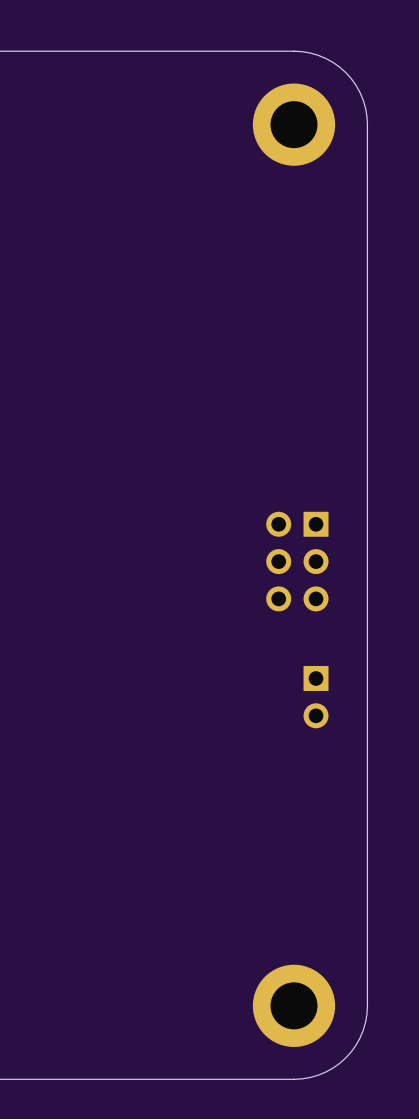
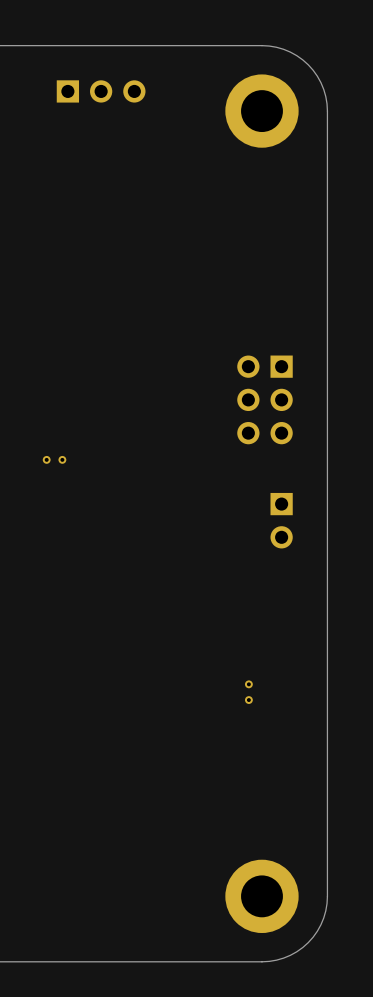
part: none -> (101, 91)
part: none -> (54, 459)
part position: (297, 561) -> (264, 399)
part position: (316, 697) -> (281, 520)
part: none -> (248, 692)

